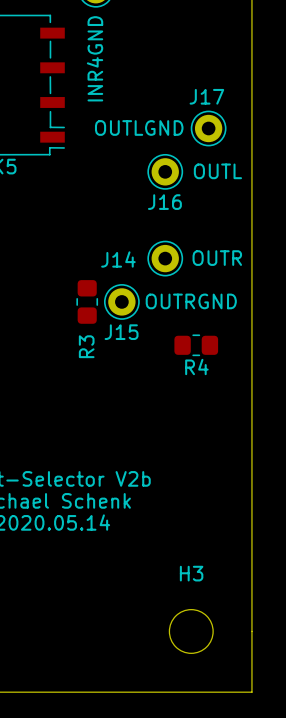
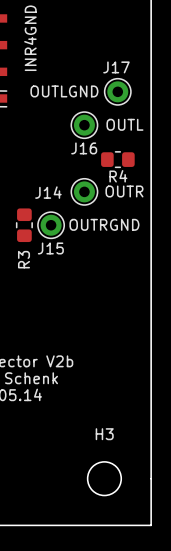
R4 position: (196, 345) -> (117, 159)

